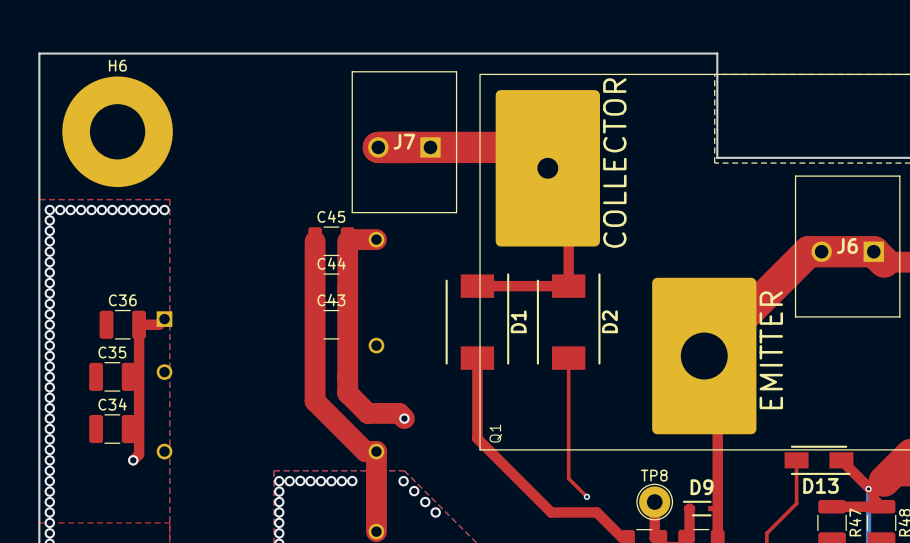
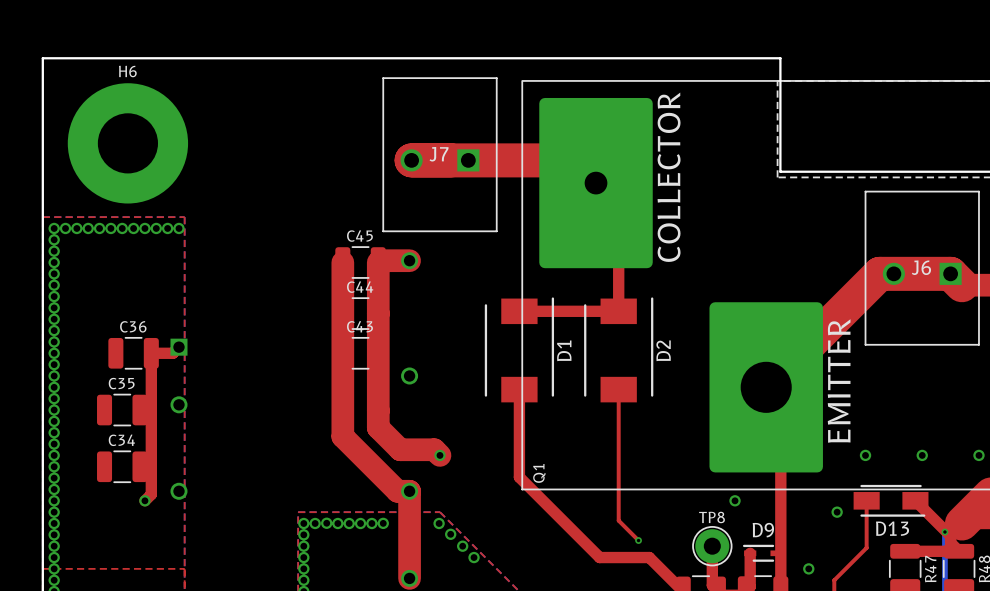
via: none -> (865, 455)
via: none -> (922, 455)
via: none -> (978, 455)
via: none -> (735, 500)
via: none -> (837, 512)
via: none -> (808, 568)

